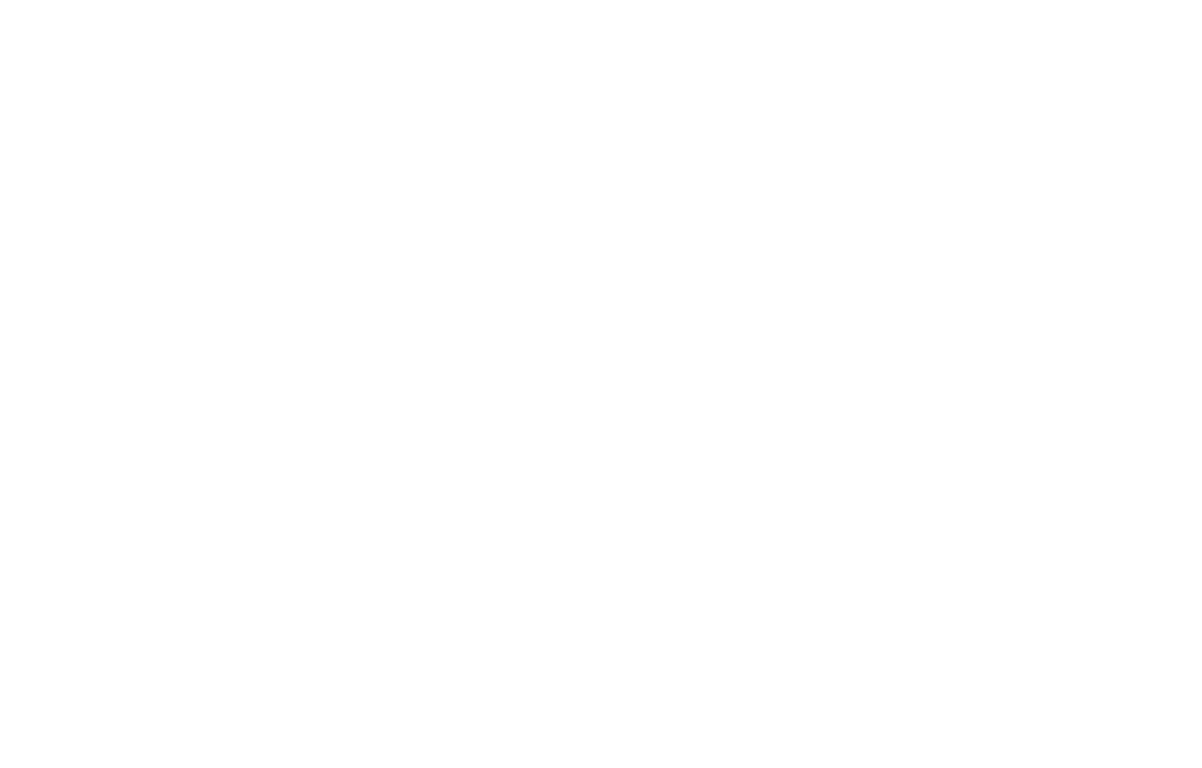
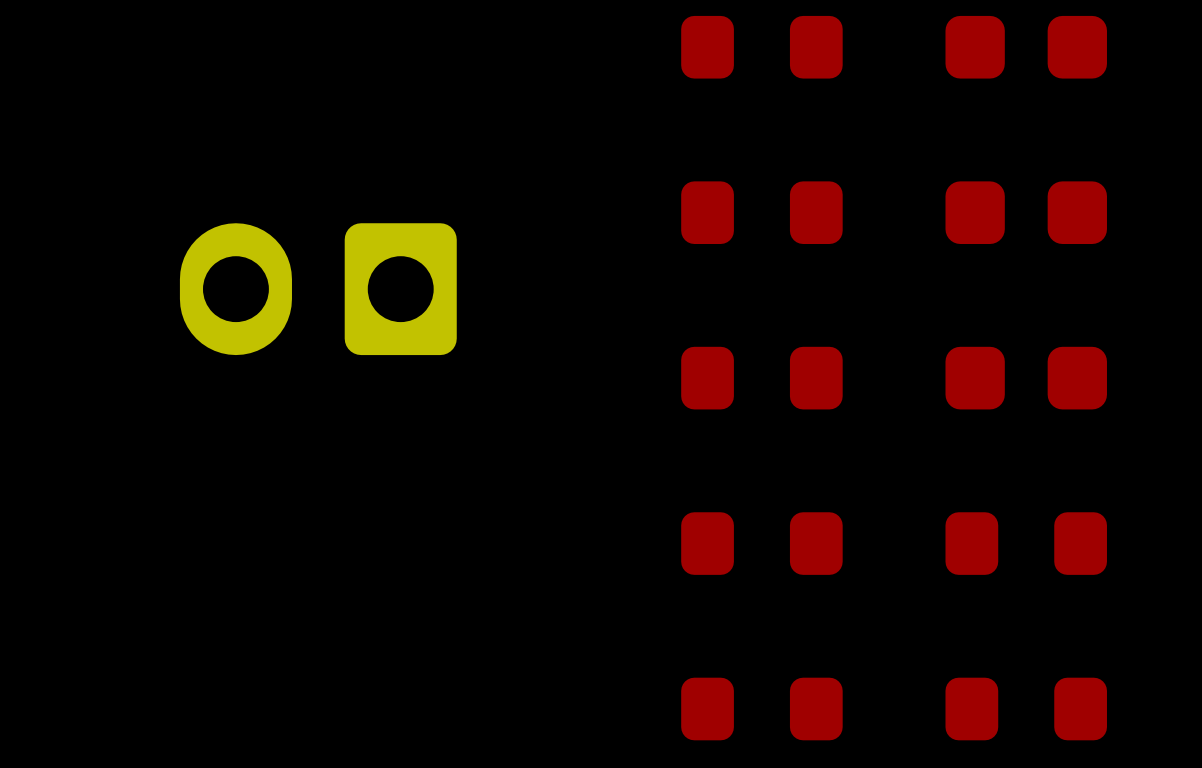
part: none -> (761, 47)
part: none -> (1026, 47)
part: none -> (761, 212)
part: none -> (1026, 212)
part: none -> (318, 289)
part: none -> (761, 378)
part: none -> (1026, 378)
part: none -> (761, 543)
part: none -> (1026, 543)
part: none -> (761, 709)
part: none -> (1026, 709)

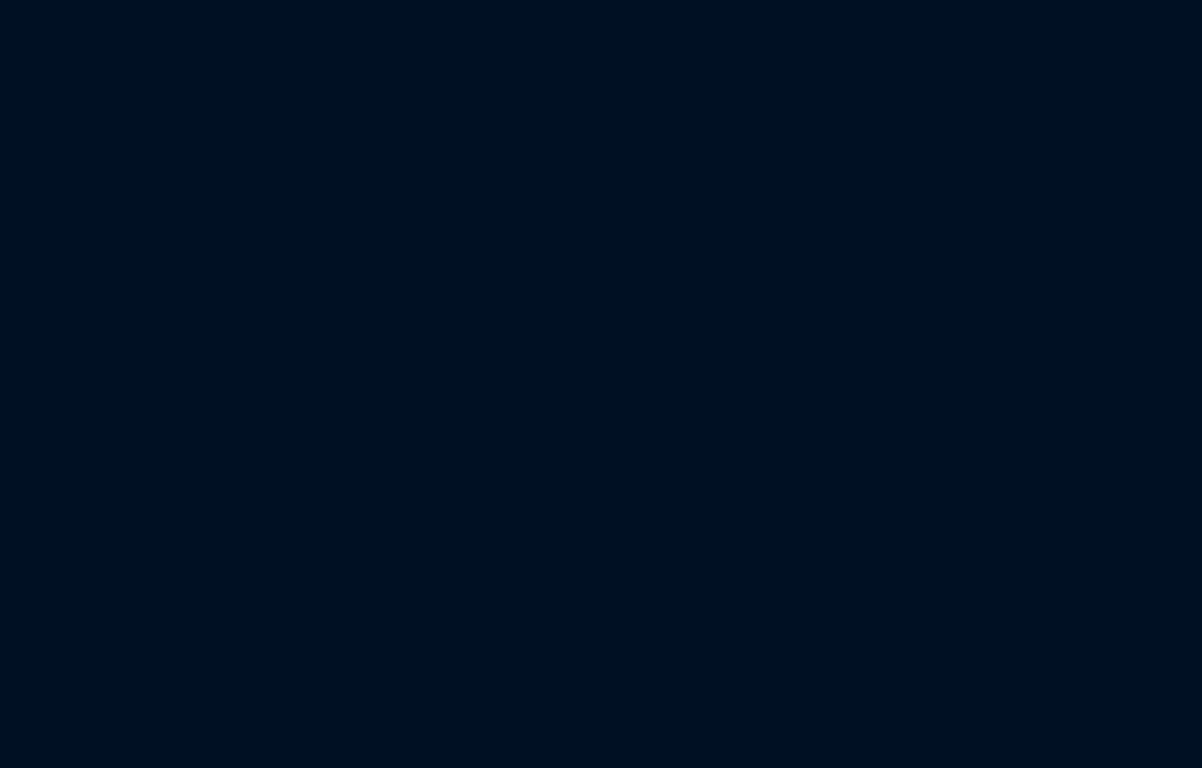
part: (761, 47) -> none
part: (1026, 47) -> none
part: (761, 212) -> none
part: (1026, 212) -> none
part: (318, 289) -> none
part: (761, 378) -> none
part: (1026, 378) -> none
part: (761, 543) -> none
part: (1026, 543) -> none
part: (761, 709) -> none
part: (1026, 709) -> none

